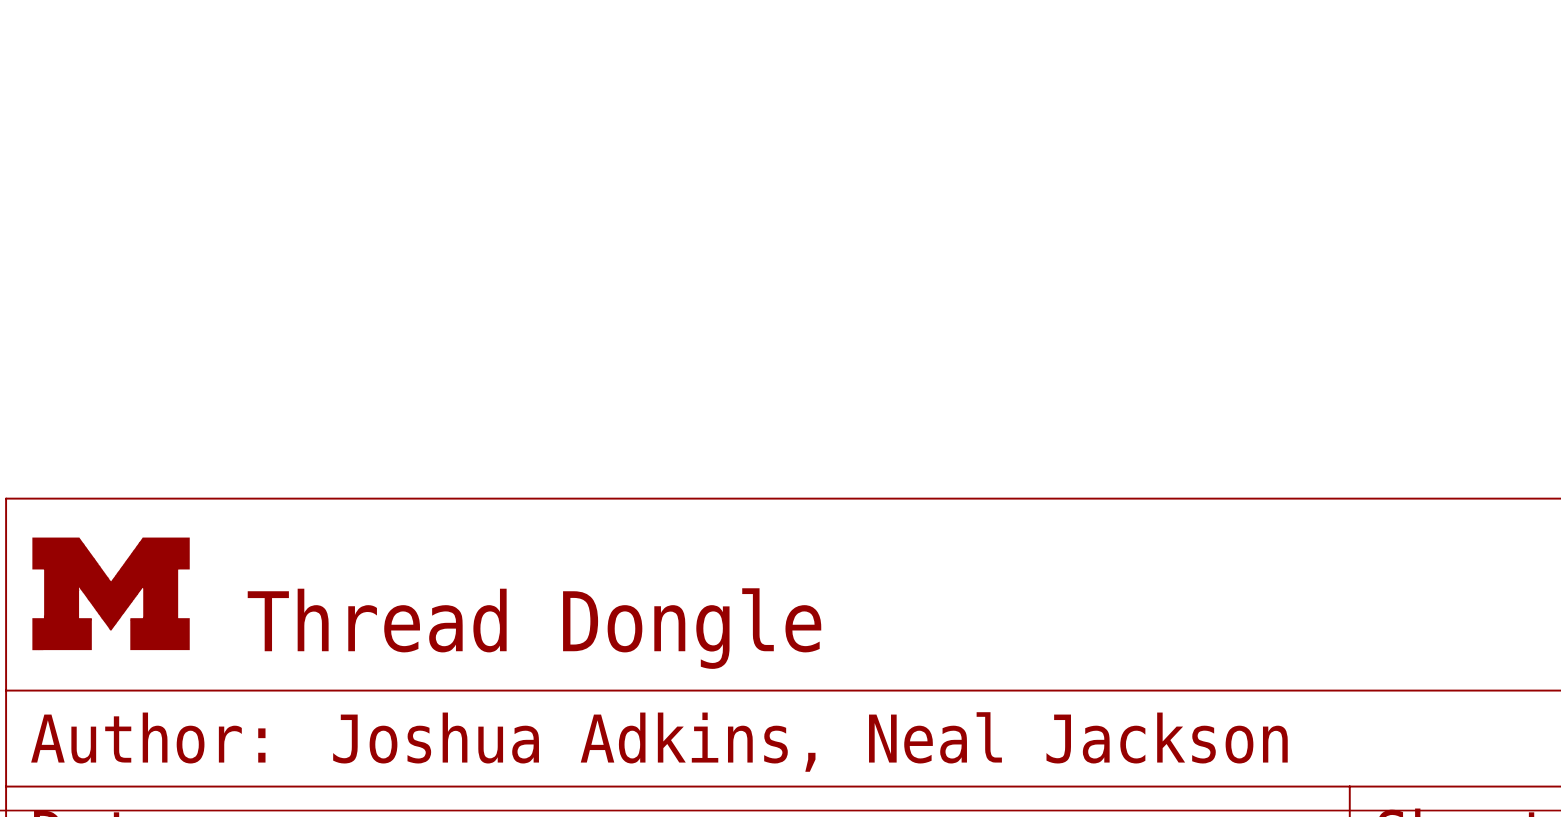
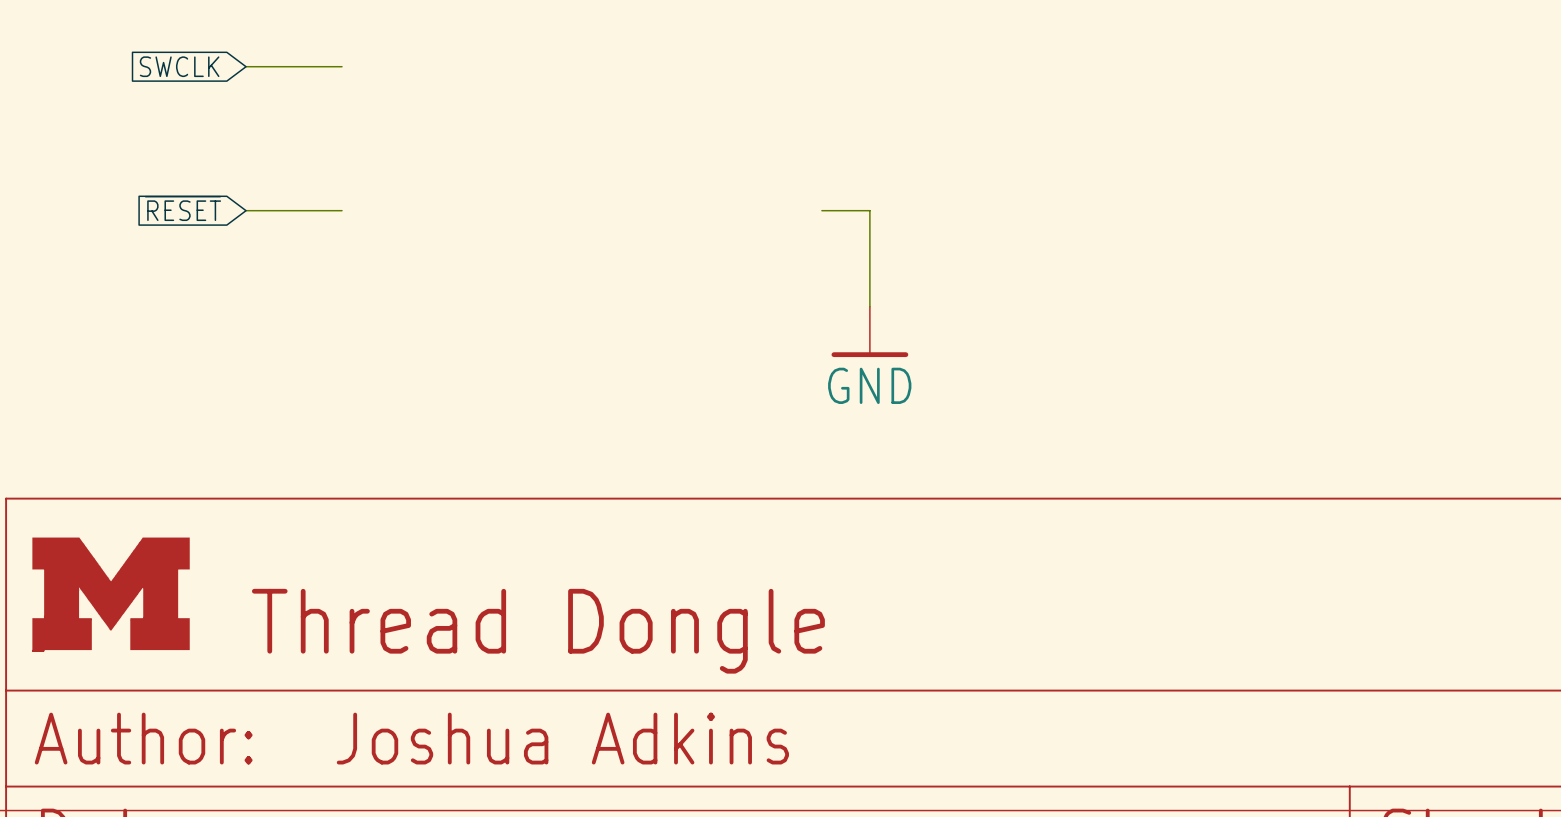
global label: none -> SWCLK (179, 66)
wire: none -> (246, 66) (342, 66)
global label: none -> ~{RESET} (182, 208)
wire: none -> (246, 210) (342, 210)
wire: none -> (821, 210) (869, 210) (869, 306)
power symbol: none -> GND (869, 331)
part text: Joshua Adkins, Neal Jackson (810, 741) -> Joshua Adkins (562, 738)

